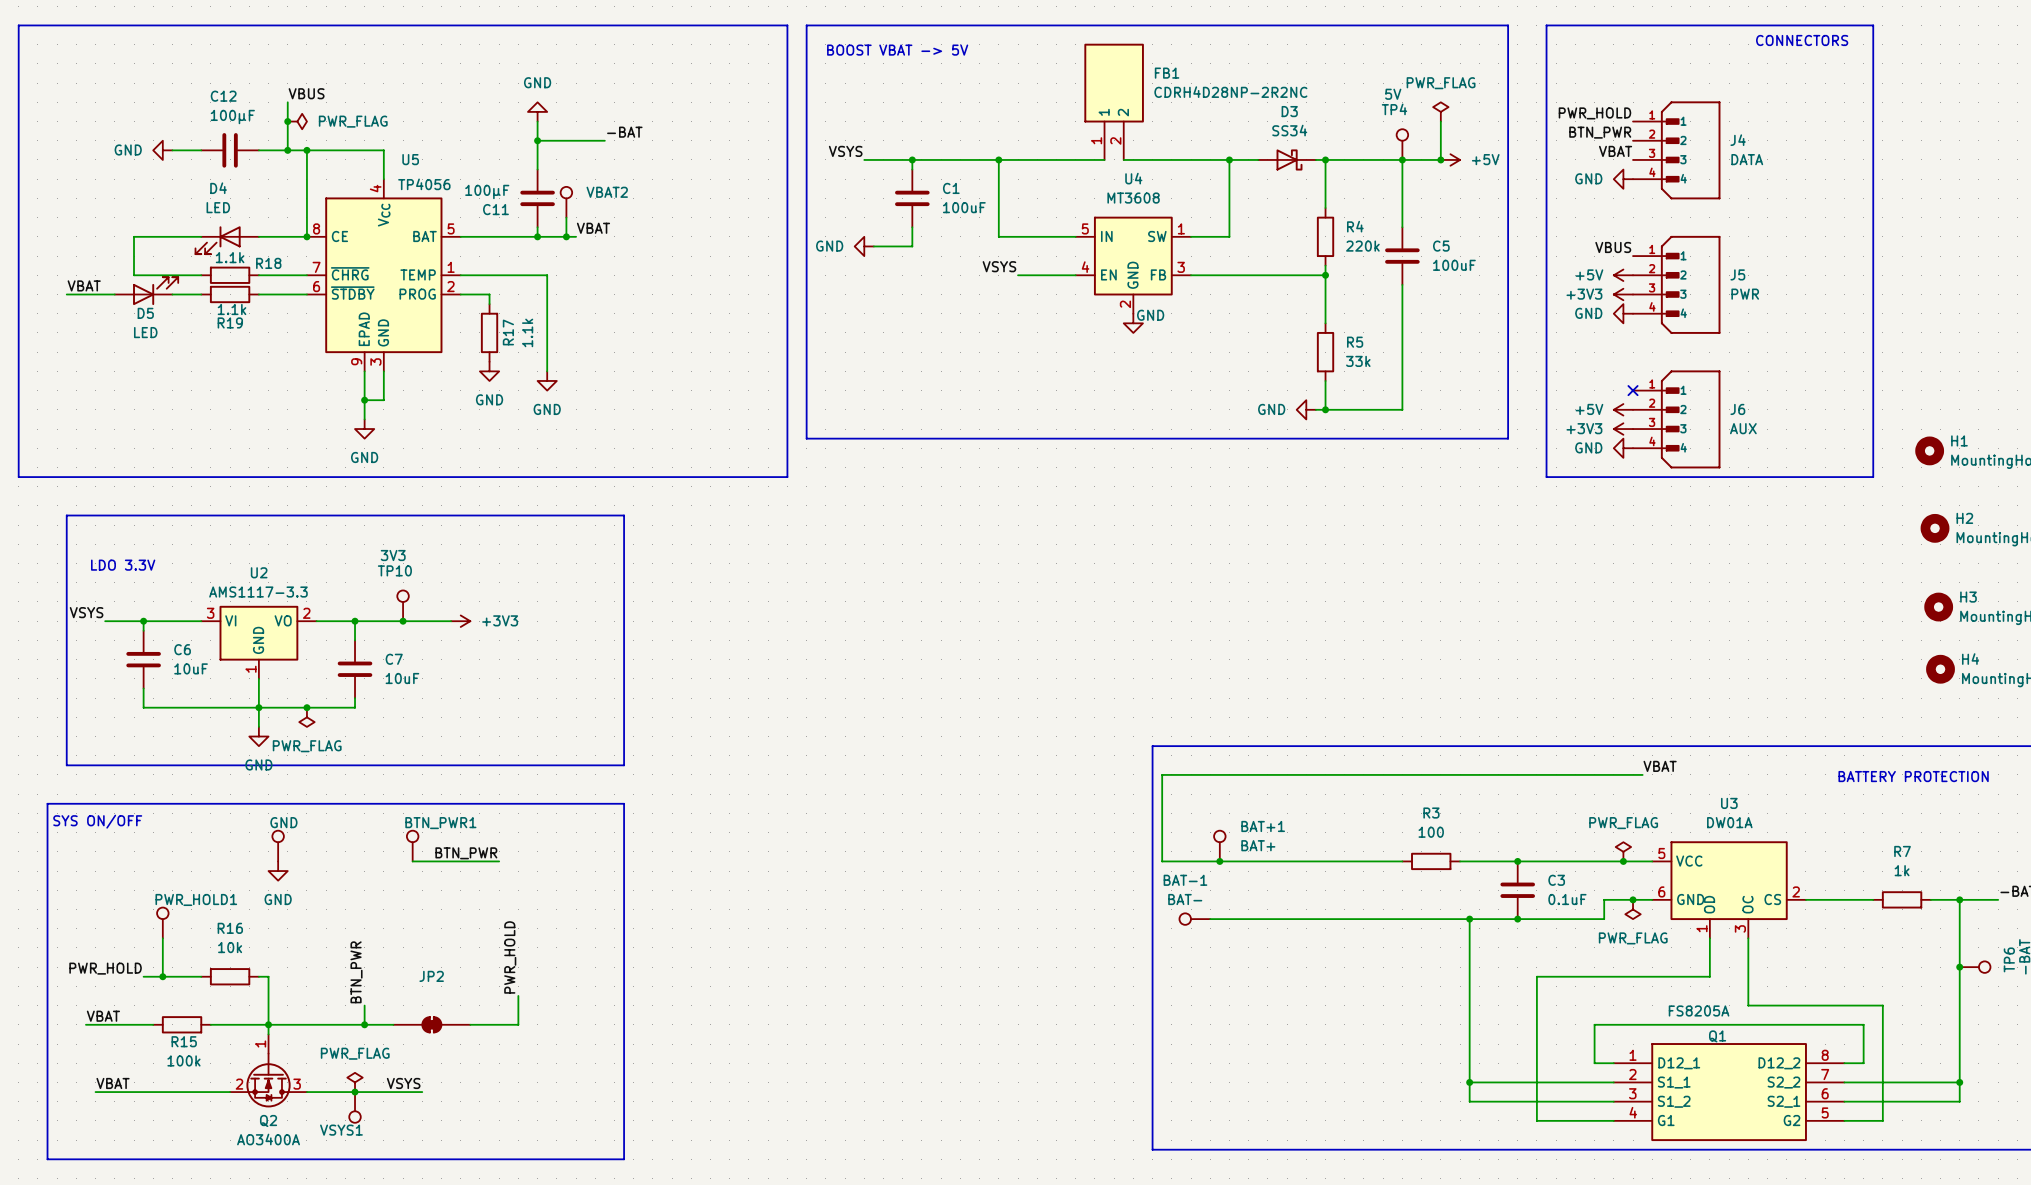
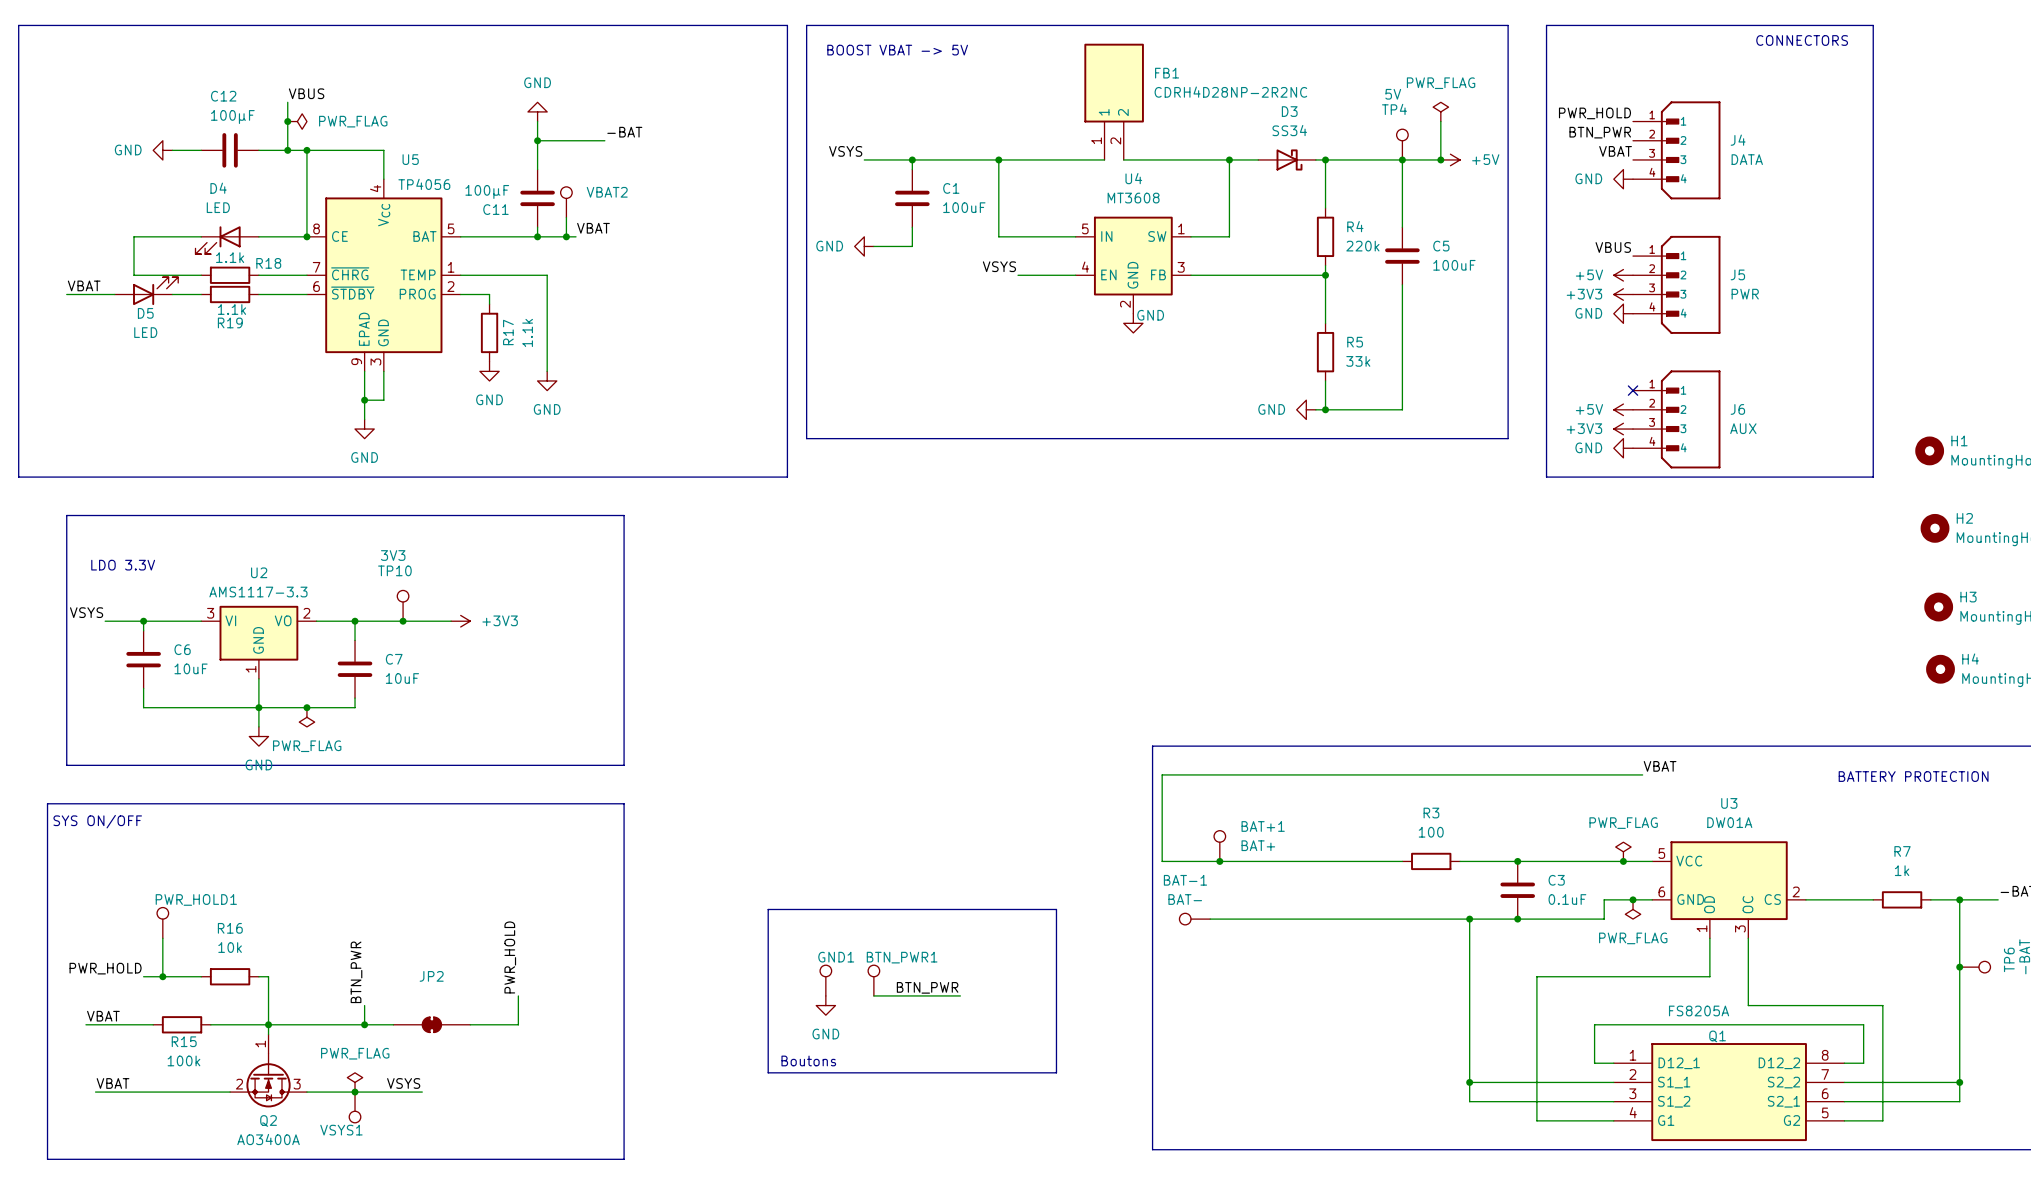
GND: (278, 846) -> none
BTN_PWR1 position: (412, 846) -> (873, 980)
label: BTN_PWR (466, 853) -> none
wire: (412, 861) (499, 861) -> none
power symbol: GND (278, 871) -> none
line: none -> (768, 909) (1056, 909) (1056, 1072) (768, 1072) (768, 909)
GND1: none -> (825, 980)
label: none -> BTN_PWR (927, 987)
wire: none -> (873, 995) (960, 995)
power symbol: none -> GND (825, 1005)
text: none -> Boutons (808, 1060)

